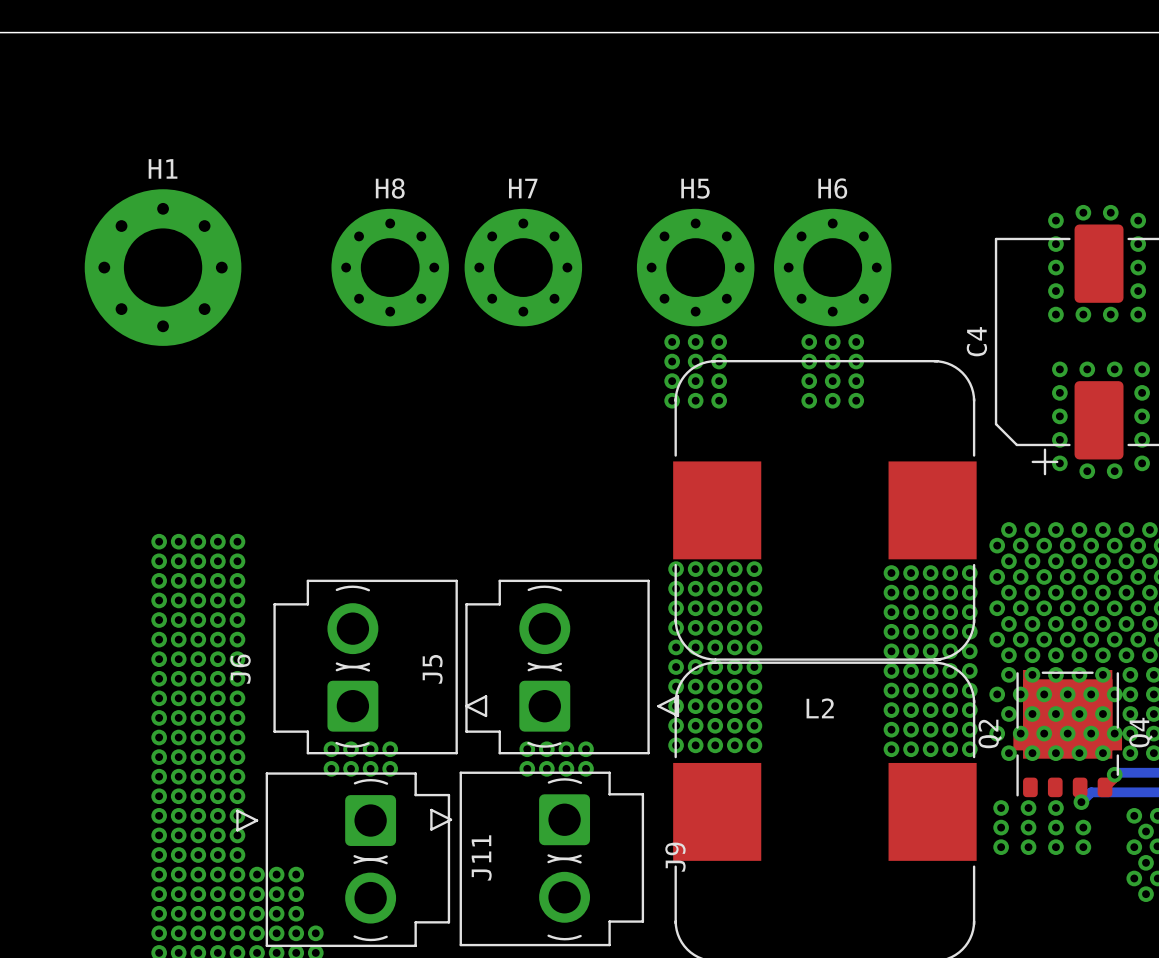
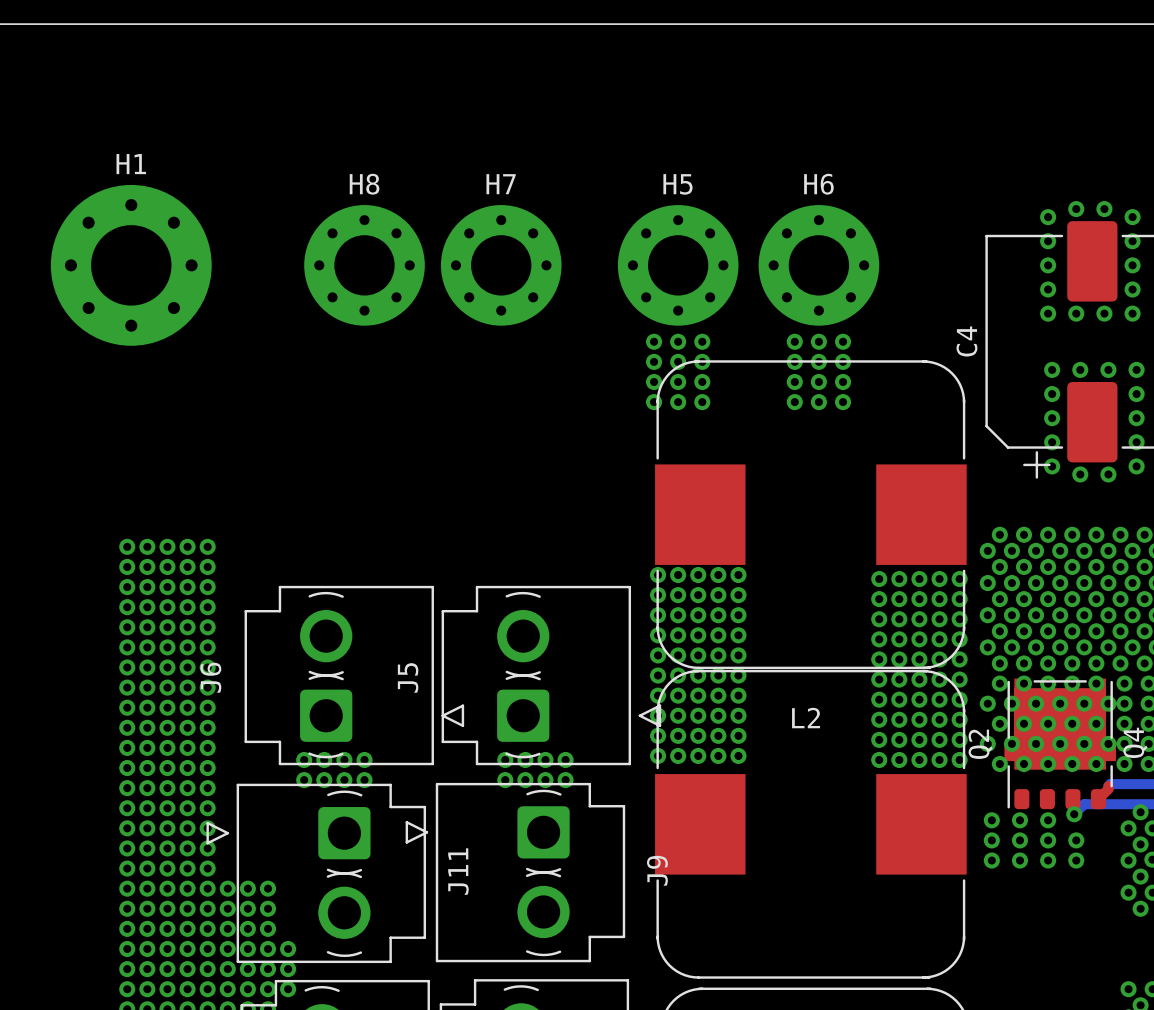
via position: (1114, 774) -> (1140, 812)

